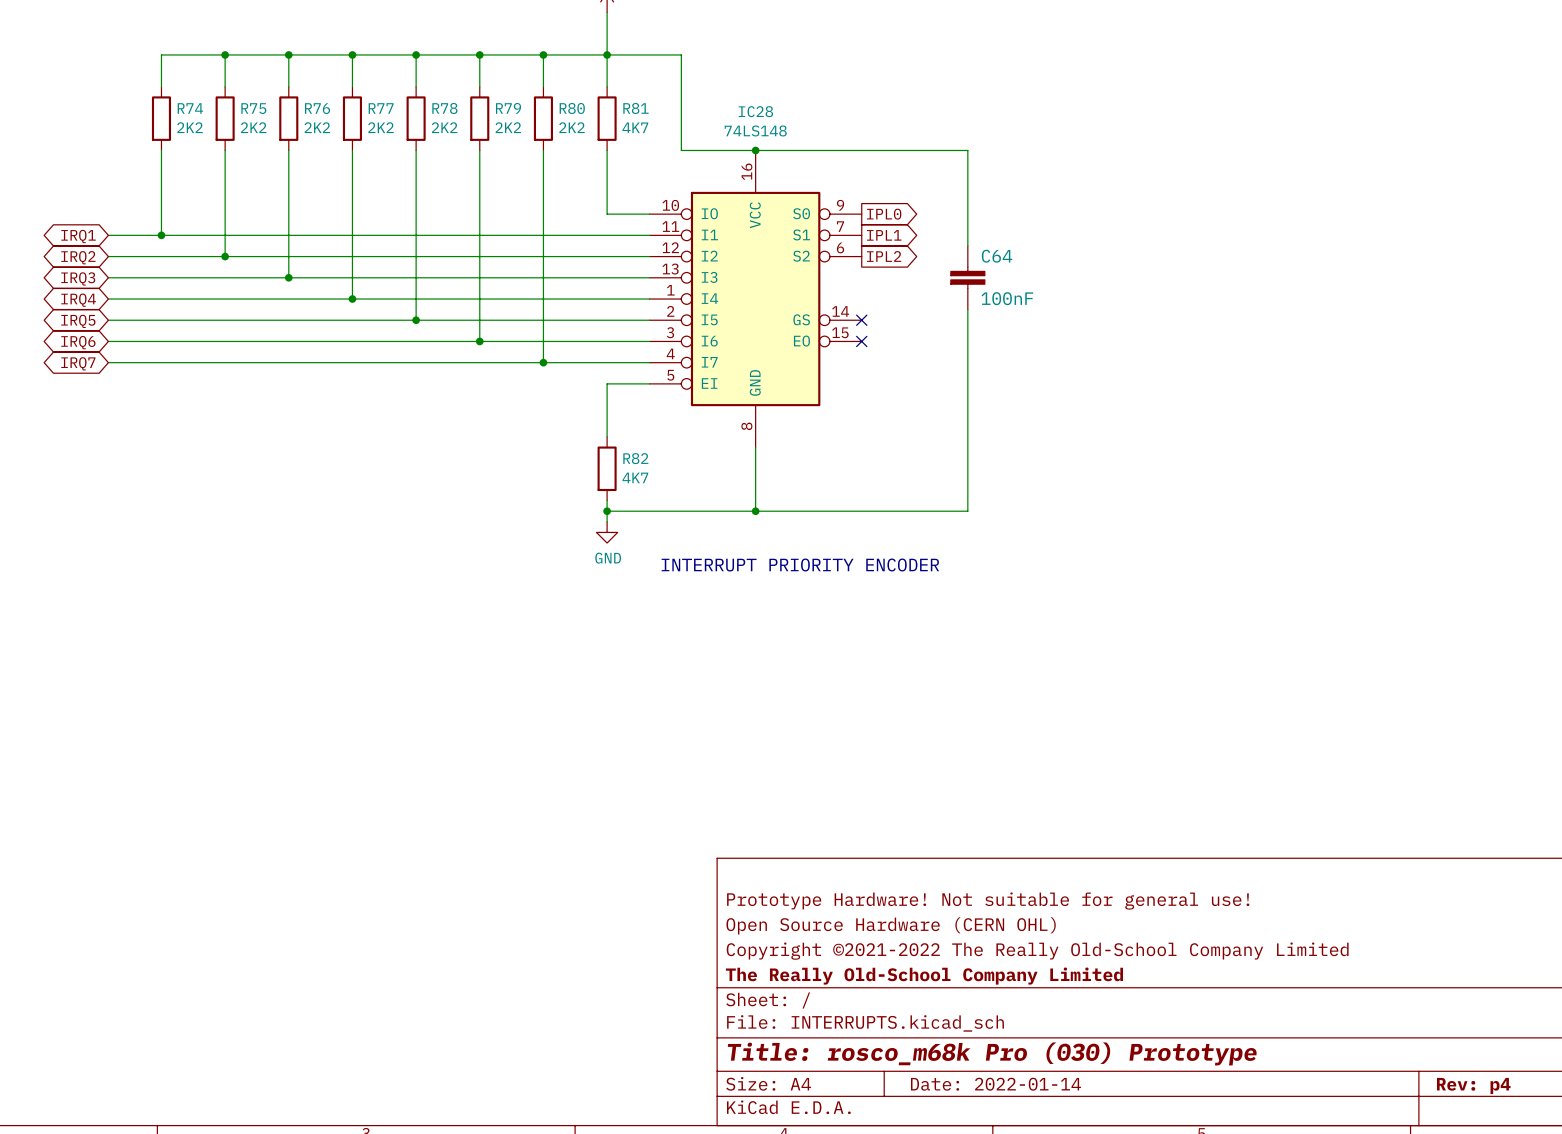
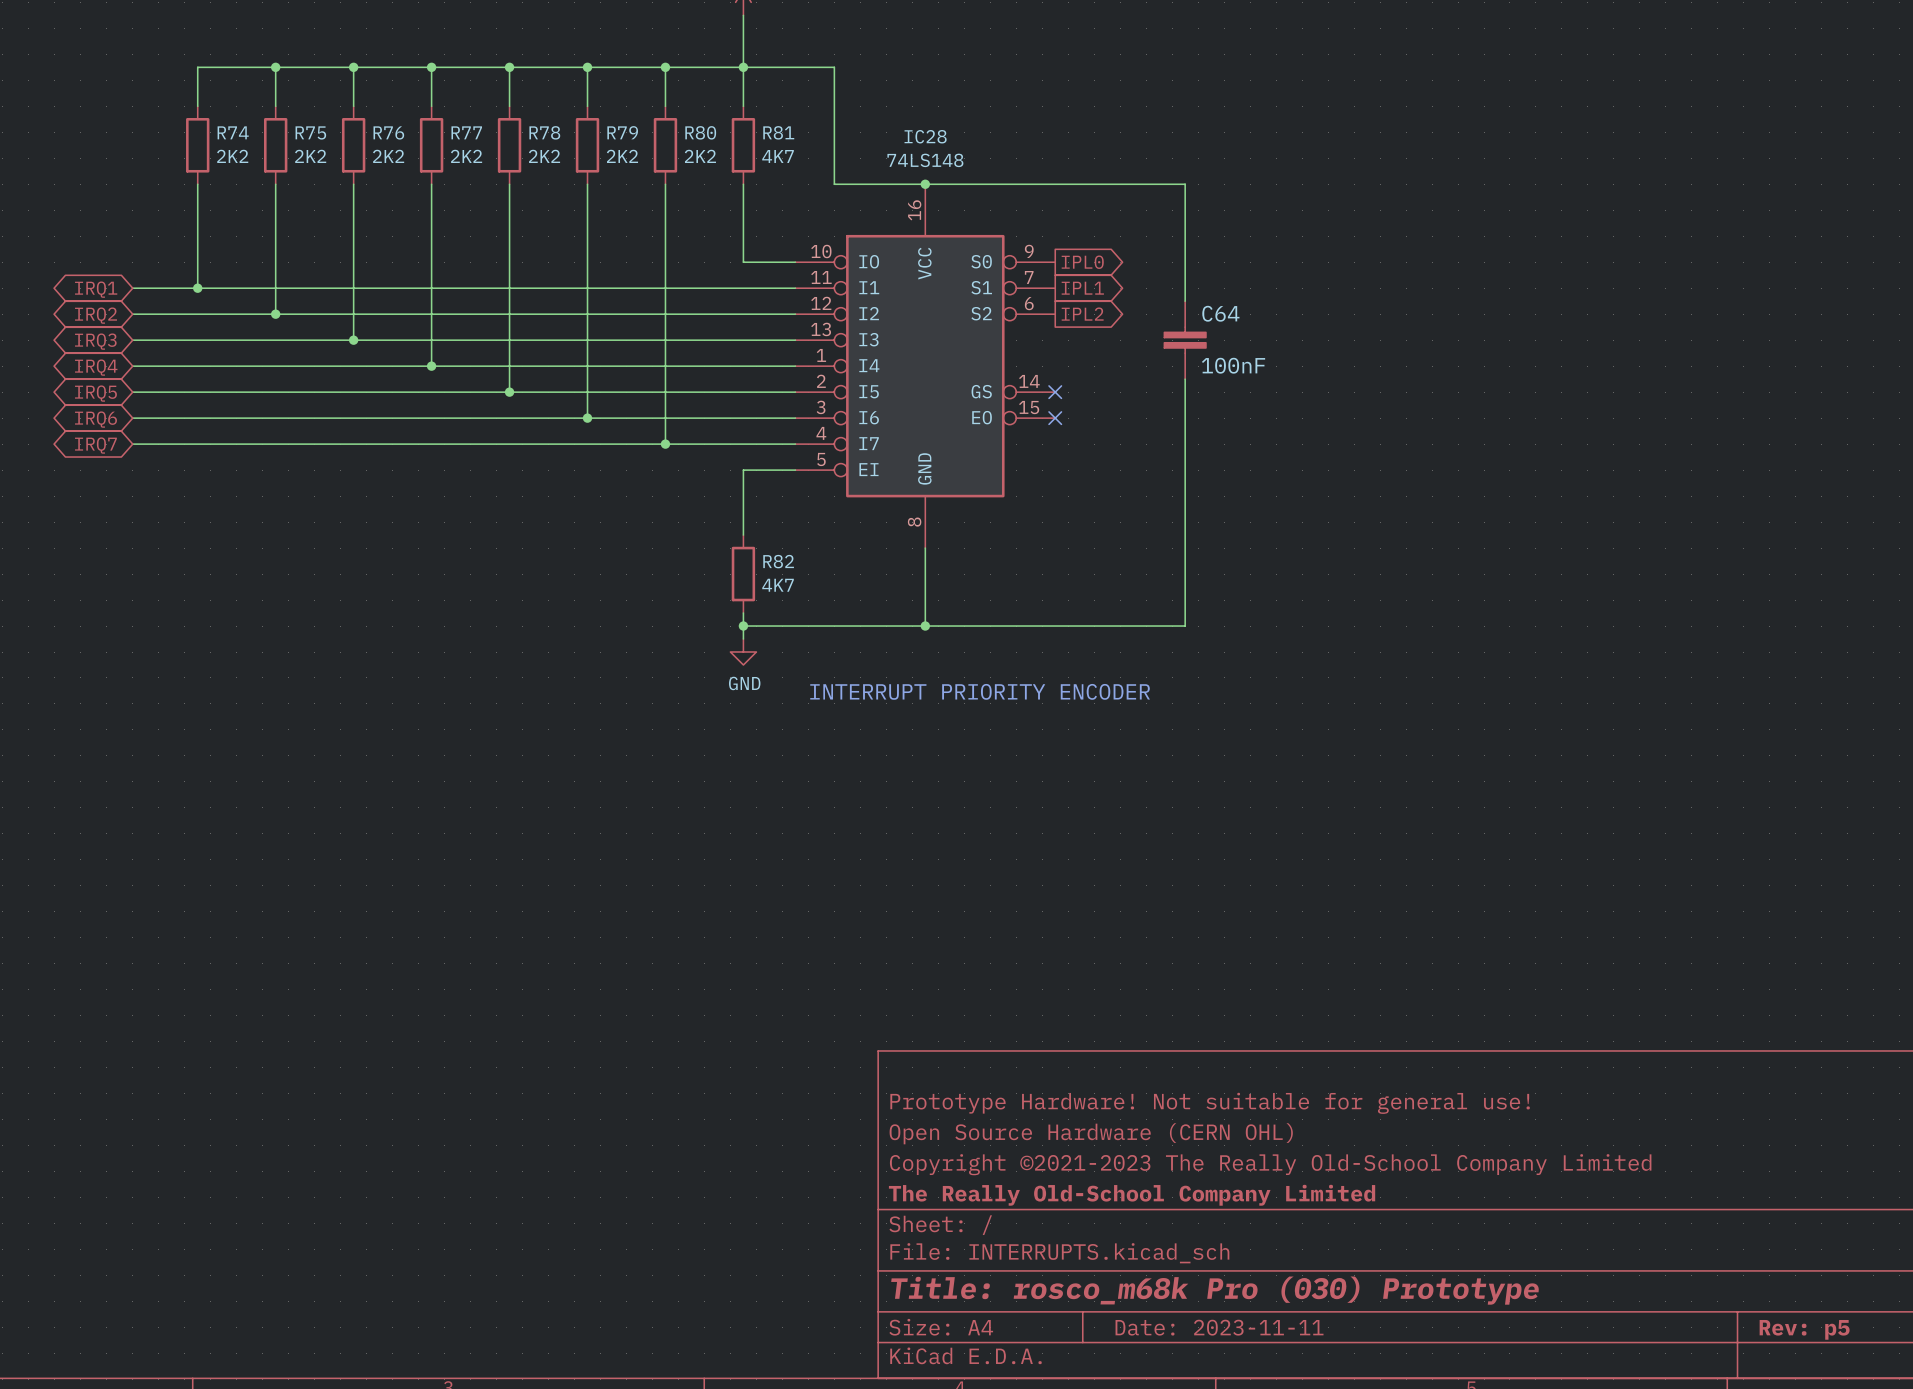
title block: Copyright ©2021-2022 The Really Old-School Company Limited (1037, 951) -> Copyright ©2021-2023 The Really Old-School Company Limited (1270, 1164)
title block: Date: 2022-01-14 (995, 1084) -> Date: 2023-11-11 (1219, 1327)
title block: Rev: p4 (1473, 1085) -> Rev: p5 (1804, 1329)

